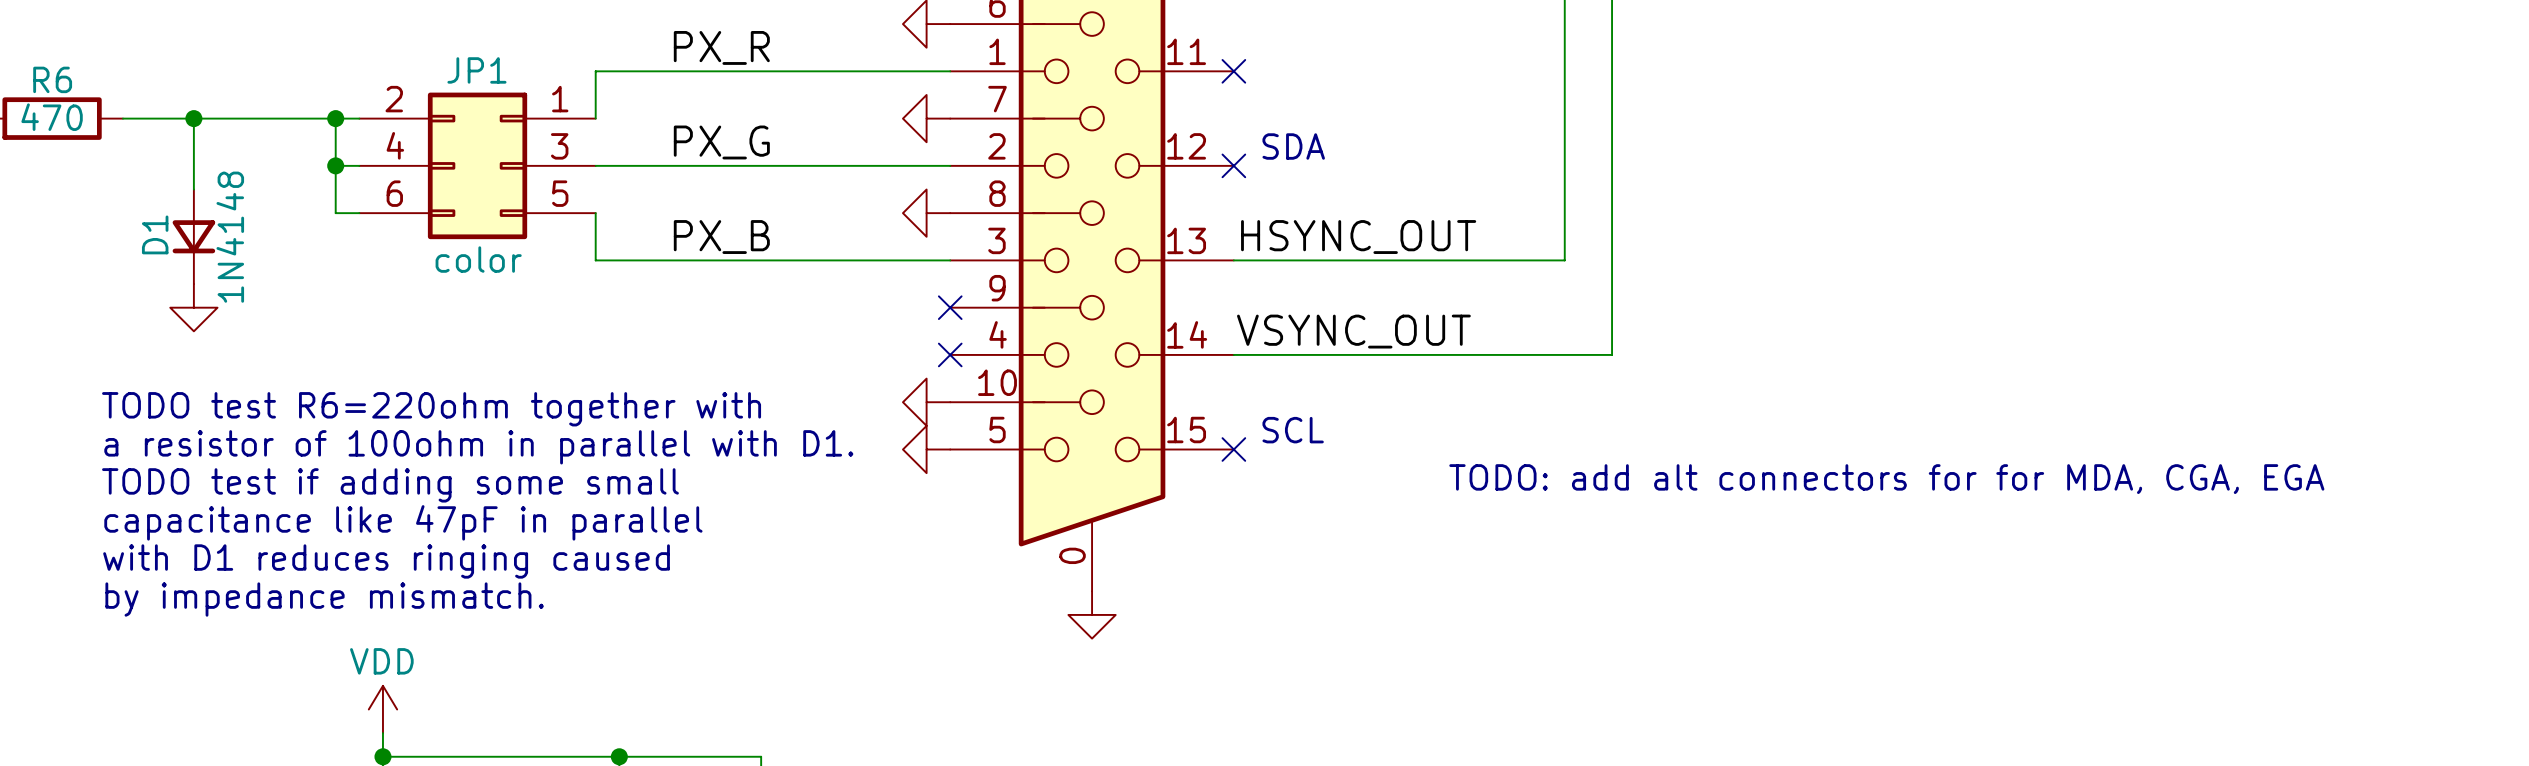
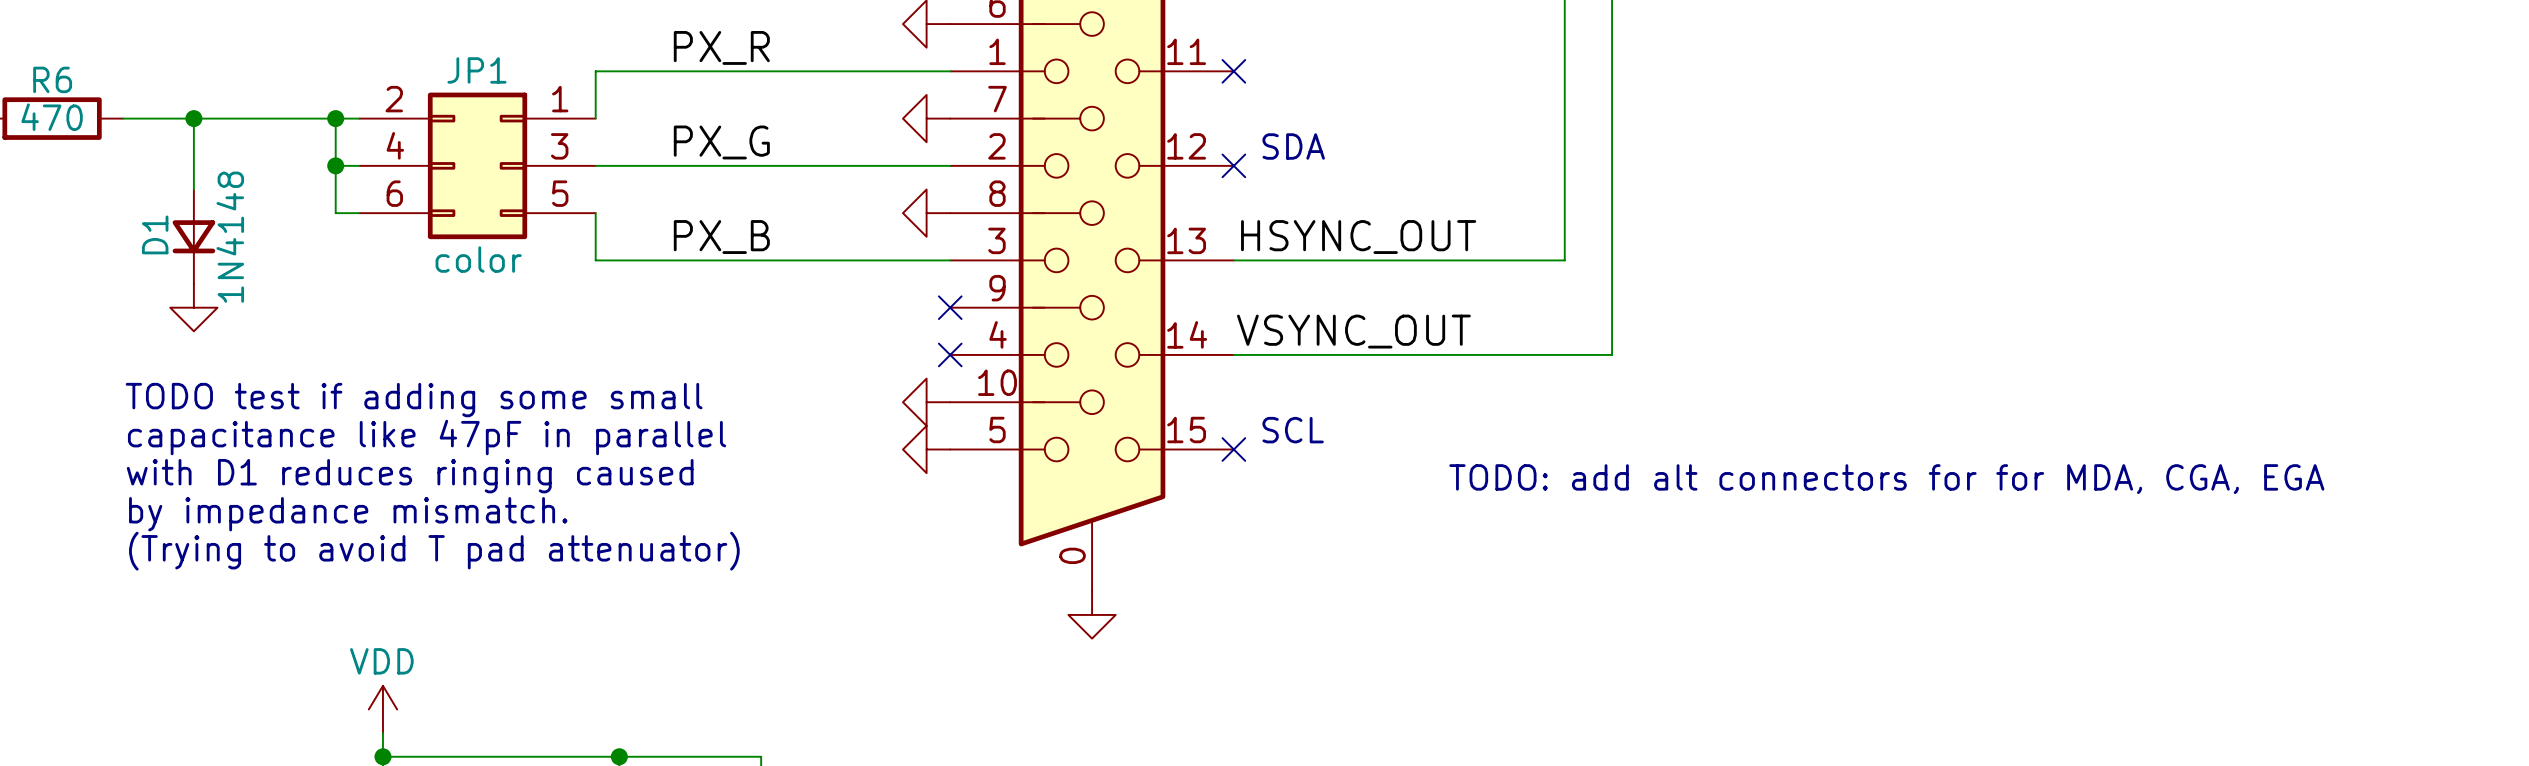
text: TODO test R6=220ohm together with (431, 409) -> none
text: a resistor of 100ohm in parallel with D1. (478, 447) -> none
text position: TODO test if adding some small (390, 485) -> TODO test if adding some small (414, 400)
text position: capacitance like 47pF in parallel (403, 522) -> capacitance like 47pF in parallel (427, 437)
text: none -> (Trying to avoid T pad attenuator) (434, 551)
text position: with D1 reduces ringing caused (386, 561) -> with D1 reduces ringing caused (410, 476)
text position: by impedance mismatch. (324, 599) -> by impedance mismatch. (348, 514)

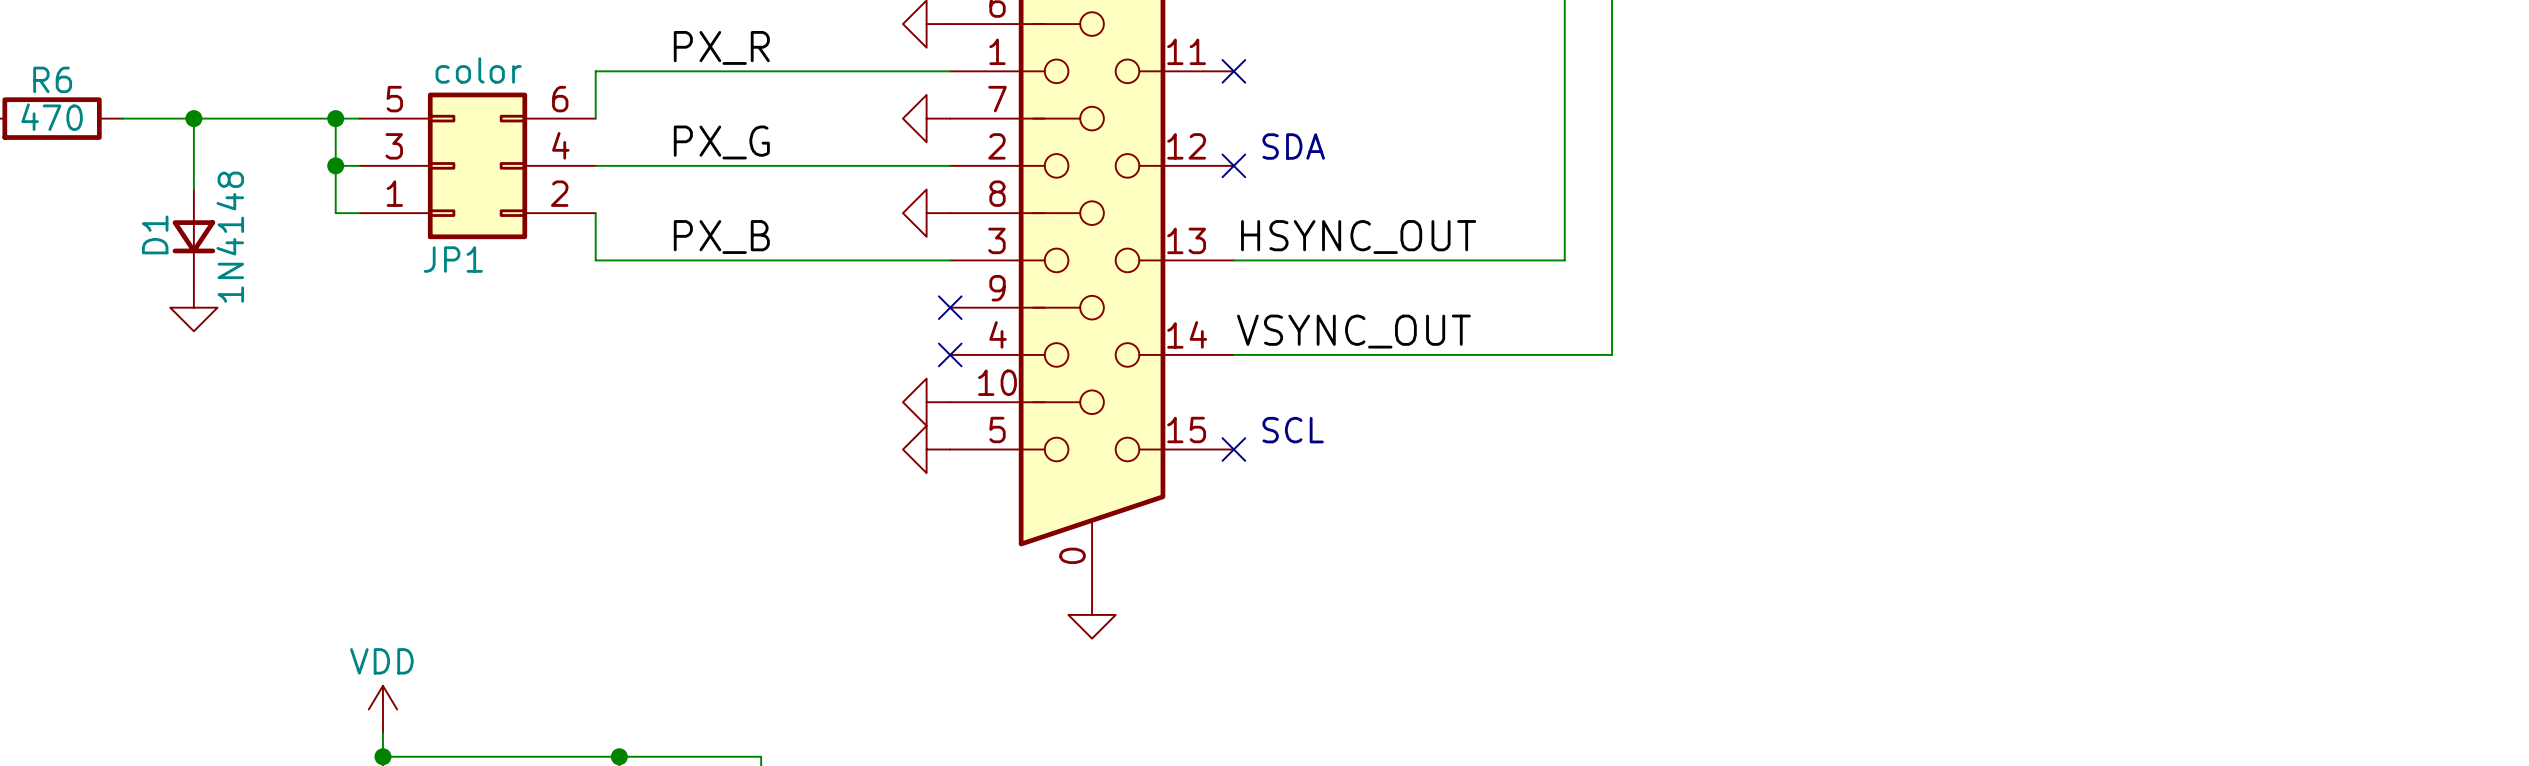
JP1 rotation: 0° (477, 165) -> 180° (477, 165)
text: TODO test if adding some small (414, 400) -> none
text: capacitance like 47pF in parallel (427, 437) -> none
text: with D1 reduces ringing caused (410, 476) -> none
text: TODO: add alt connectors for for MDA, CGA, EGA (1886, 479) -> none
text: by impedance mismatch. (348, 514) -> none
text: (Trying to avoid T pad attenuator) (434, 551) -> none

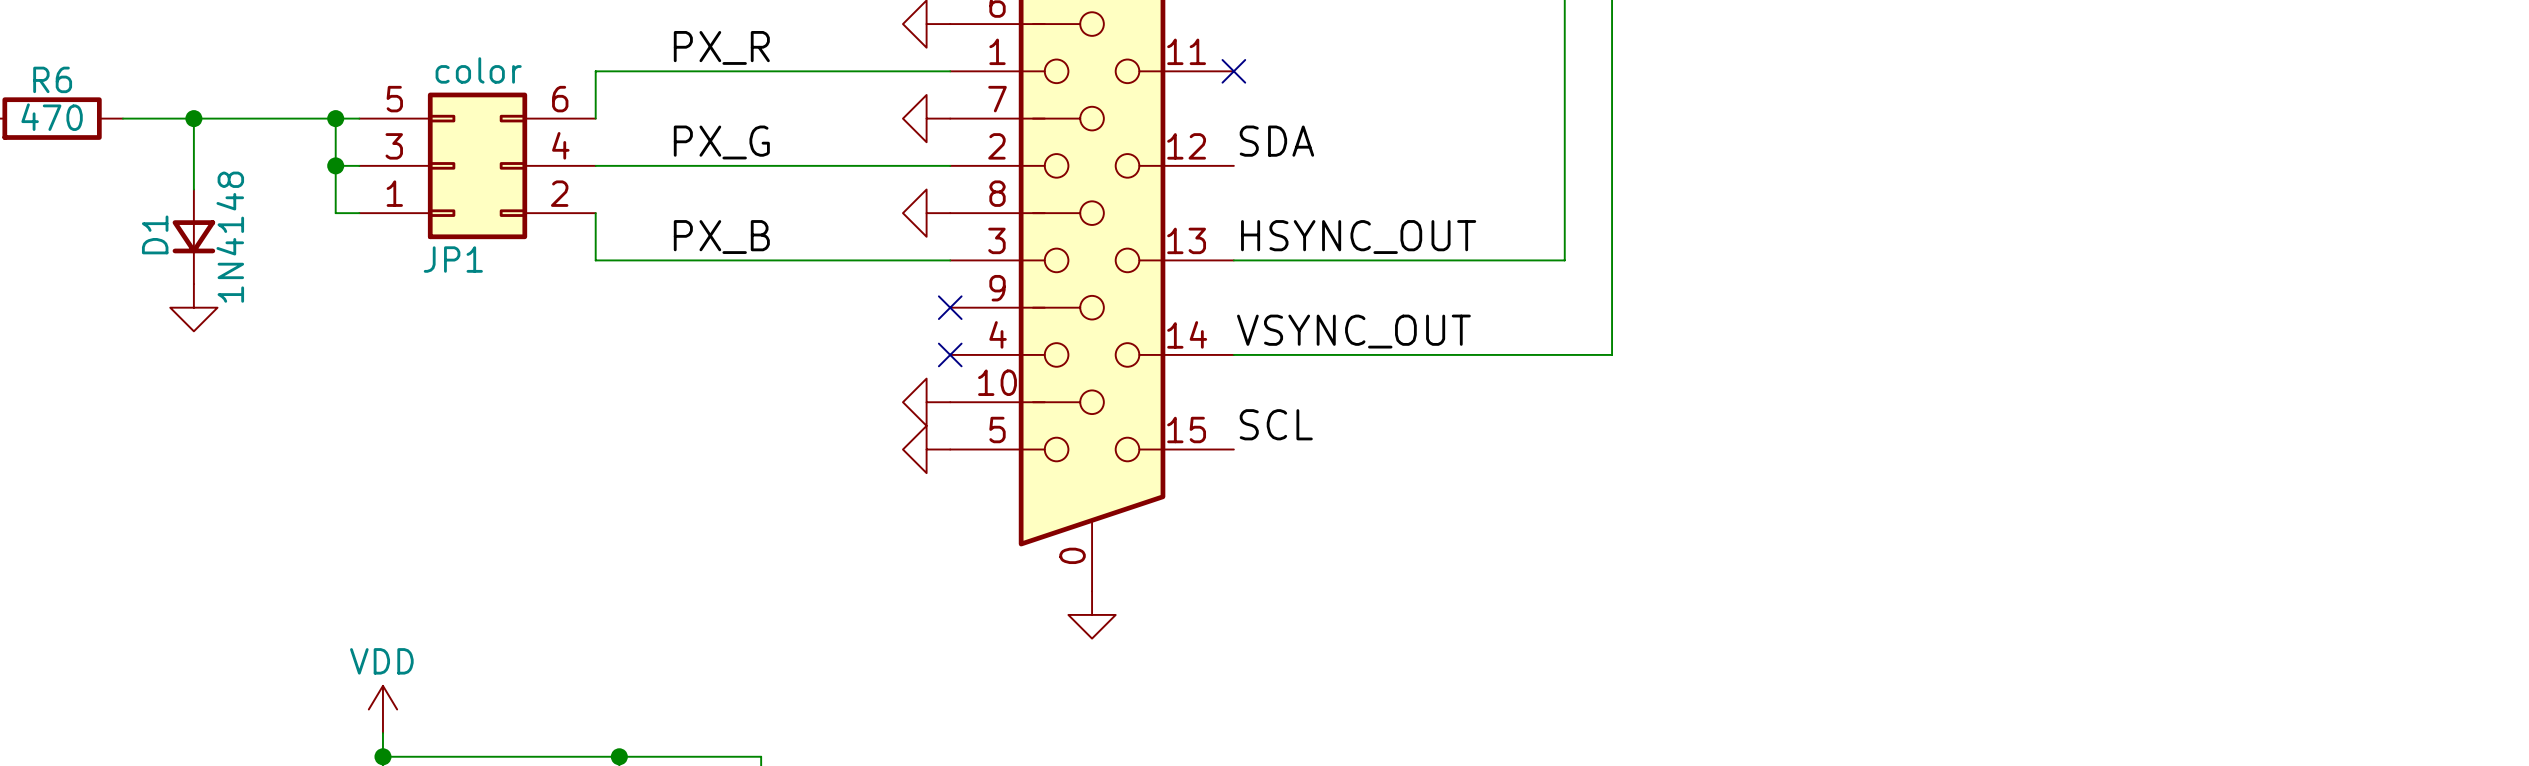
label: none -> SDA (1276, 141)
text: SDA (1293, 146) -> none
no-connect mark: (1233, 165) -> none
label: none -> SCL (1276, 424)
text: SCL (1293, 430) -> none
no-connect mark: (1233, 449) -> none

